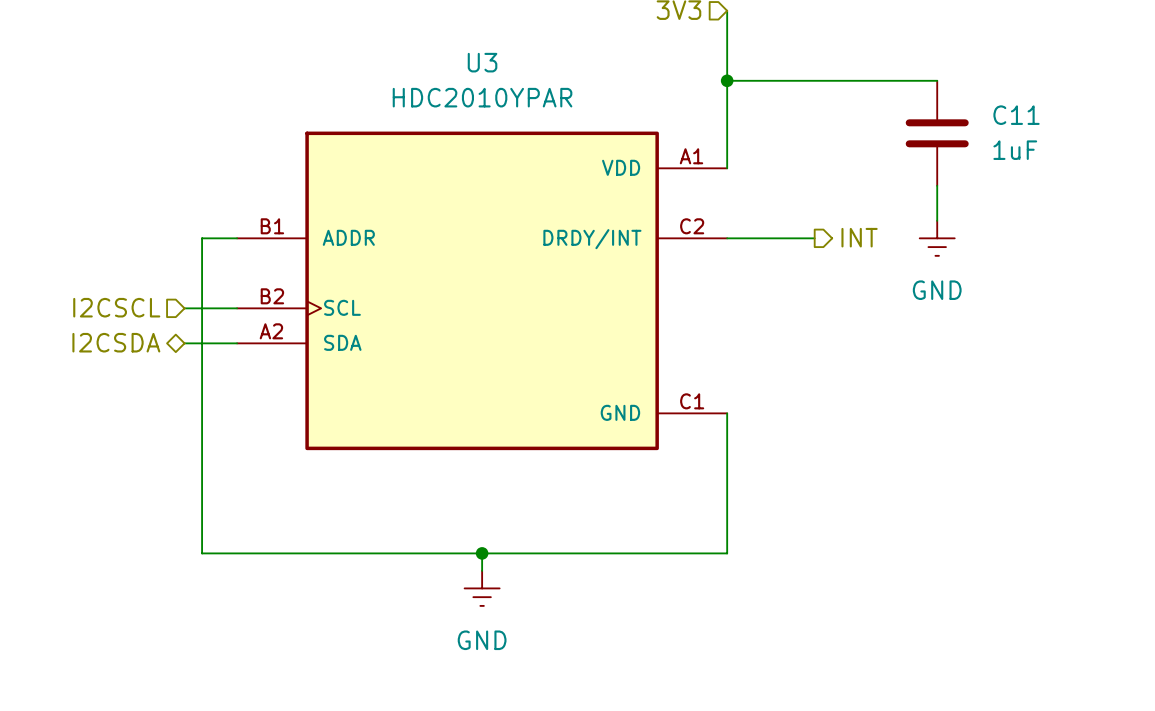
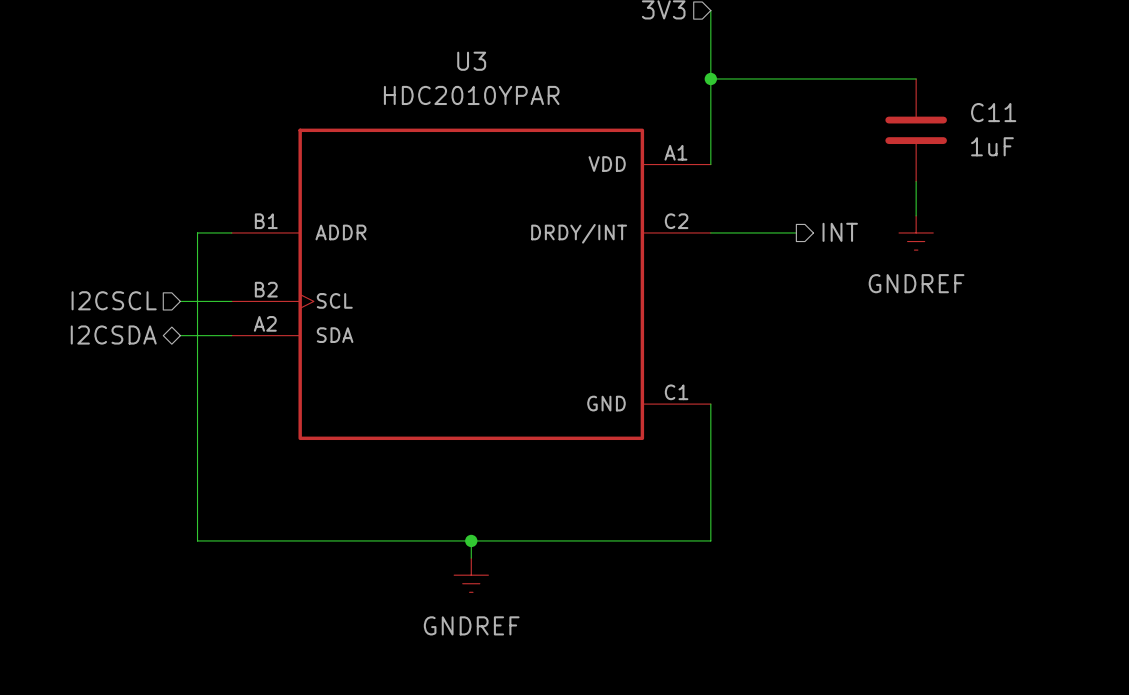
power symbol: GND (937, 238) -> GNDREF (916, 232)
power symbol: GND (482, 588) -> GNDREF (471, 575)

